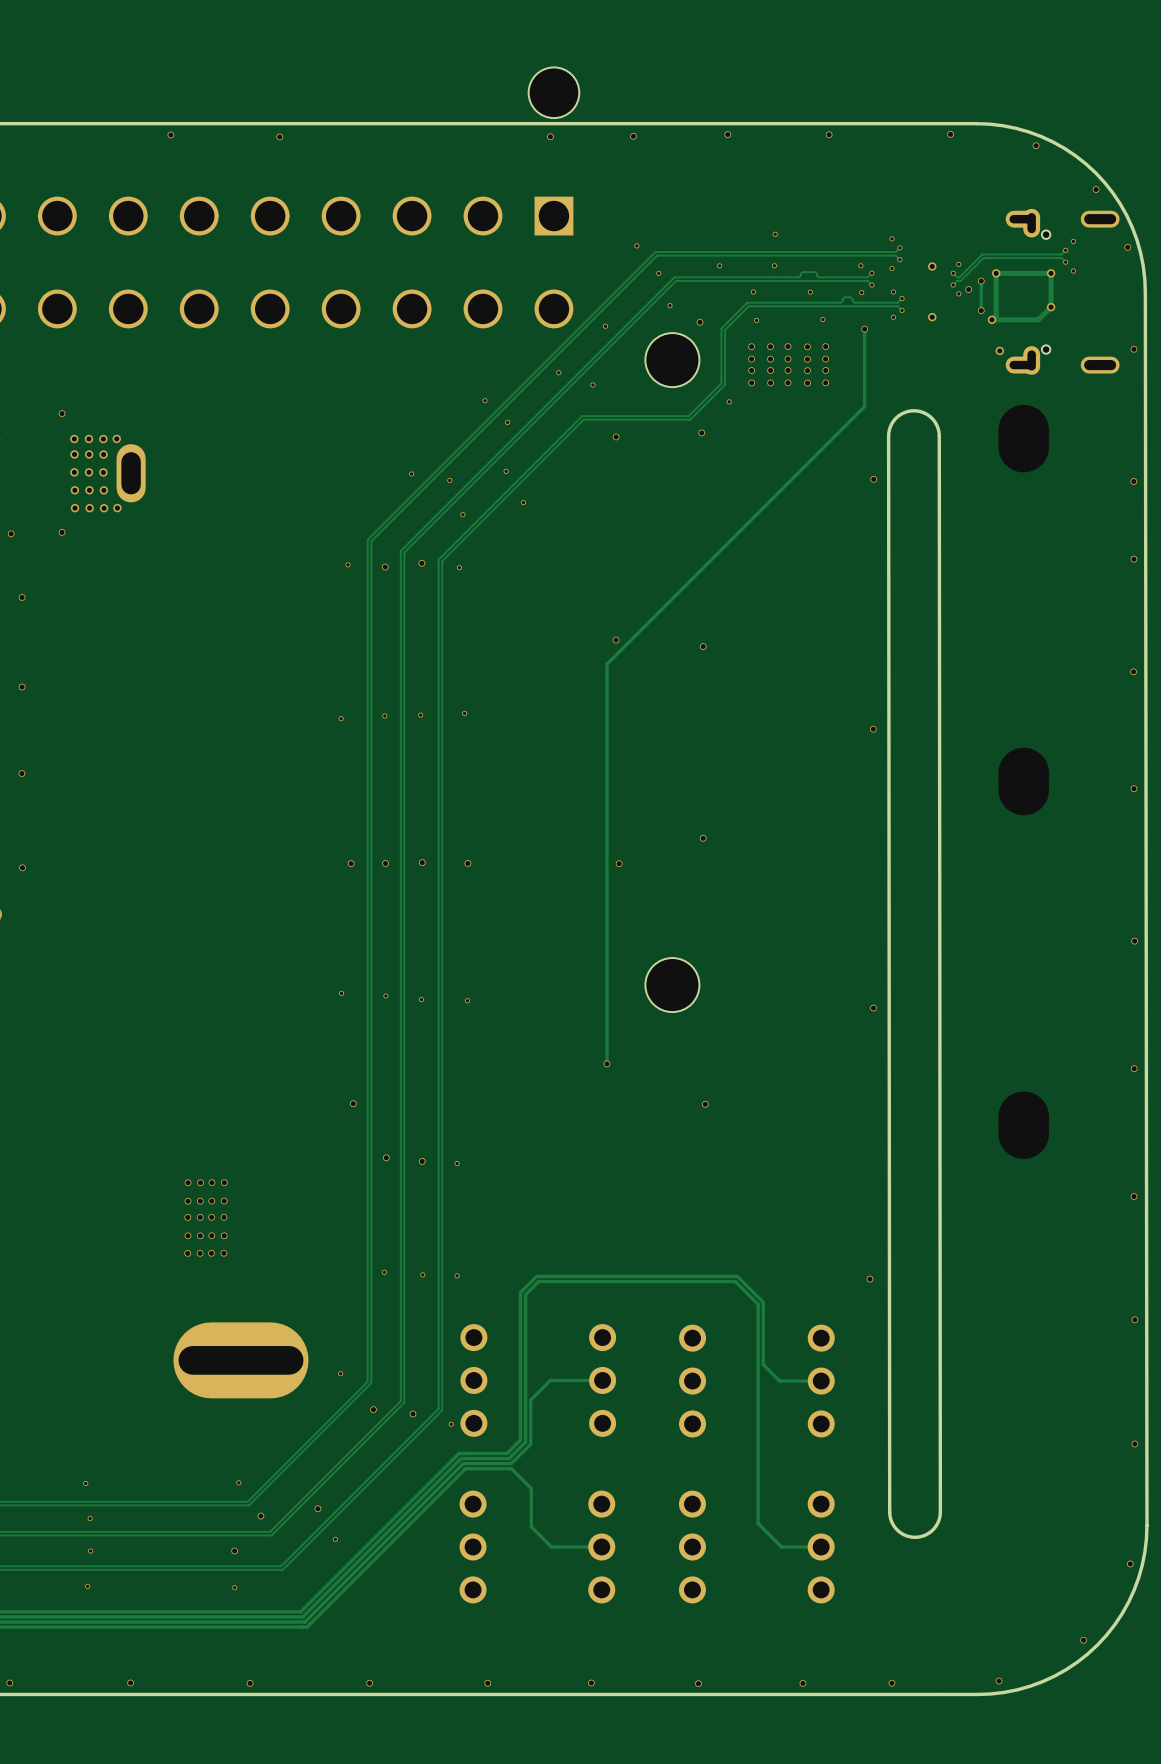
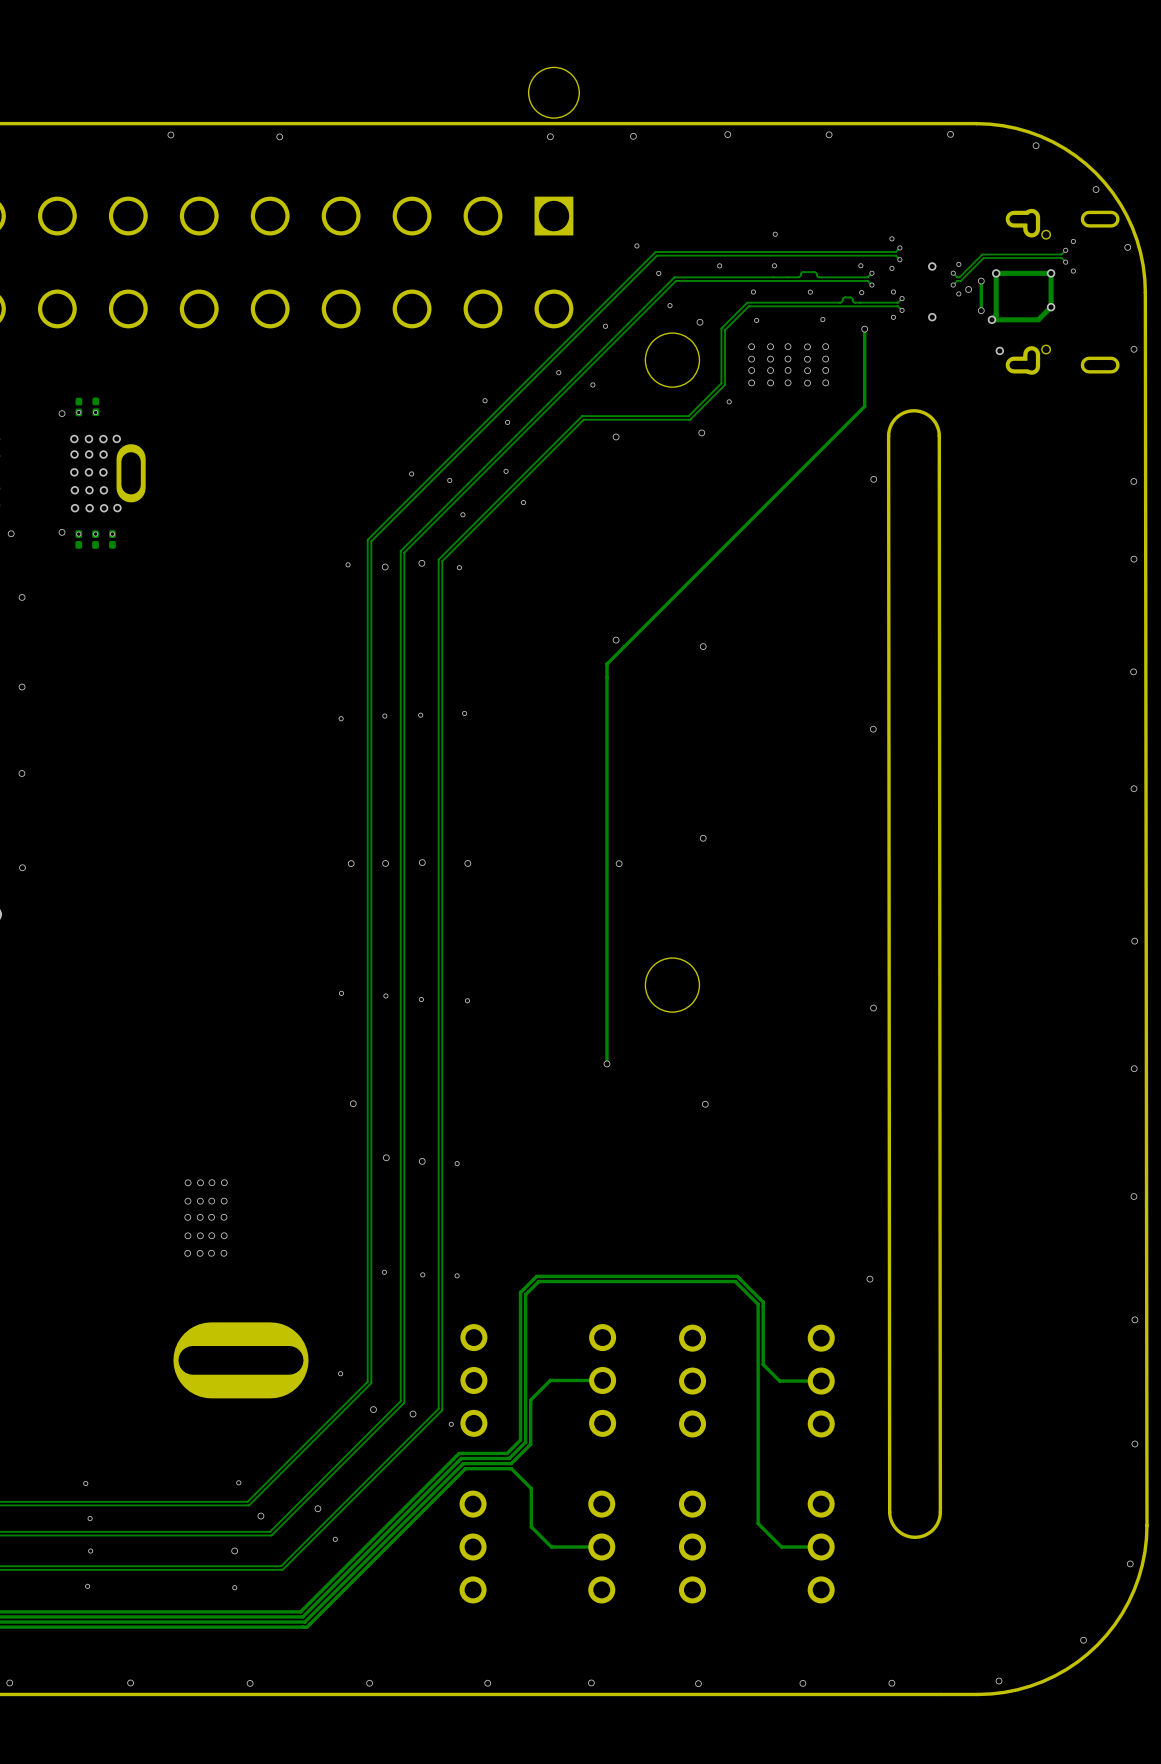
part: none -> (95, 406)
part: none -> (78, 407)
via: none -> (78, 412)
via: none -> (95, 412)
via: none -> (78, 534)
via: none -> (95, 534)
via: none -> (112, 534)
part: none -> (78, 539)
part: none -> (95, 539)
part: none -> (112, 539)

